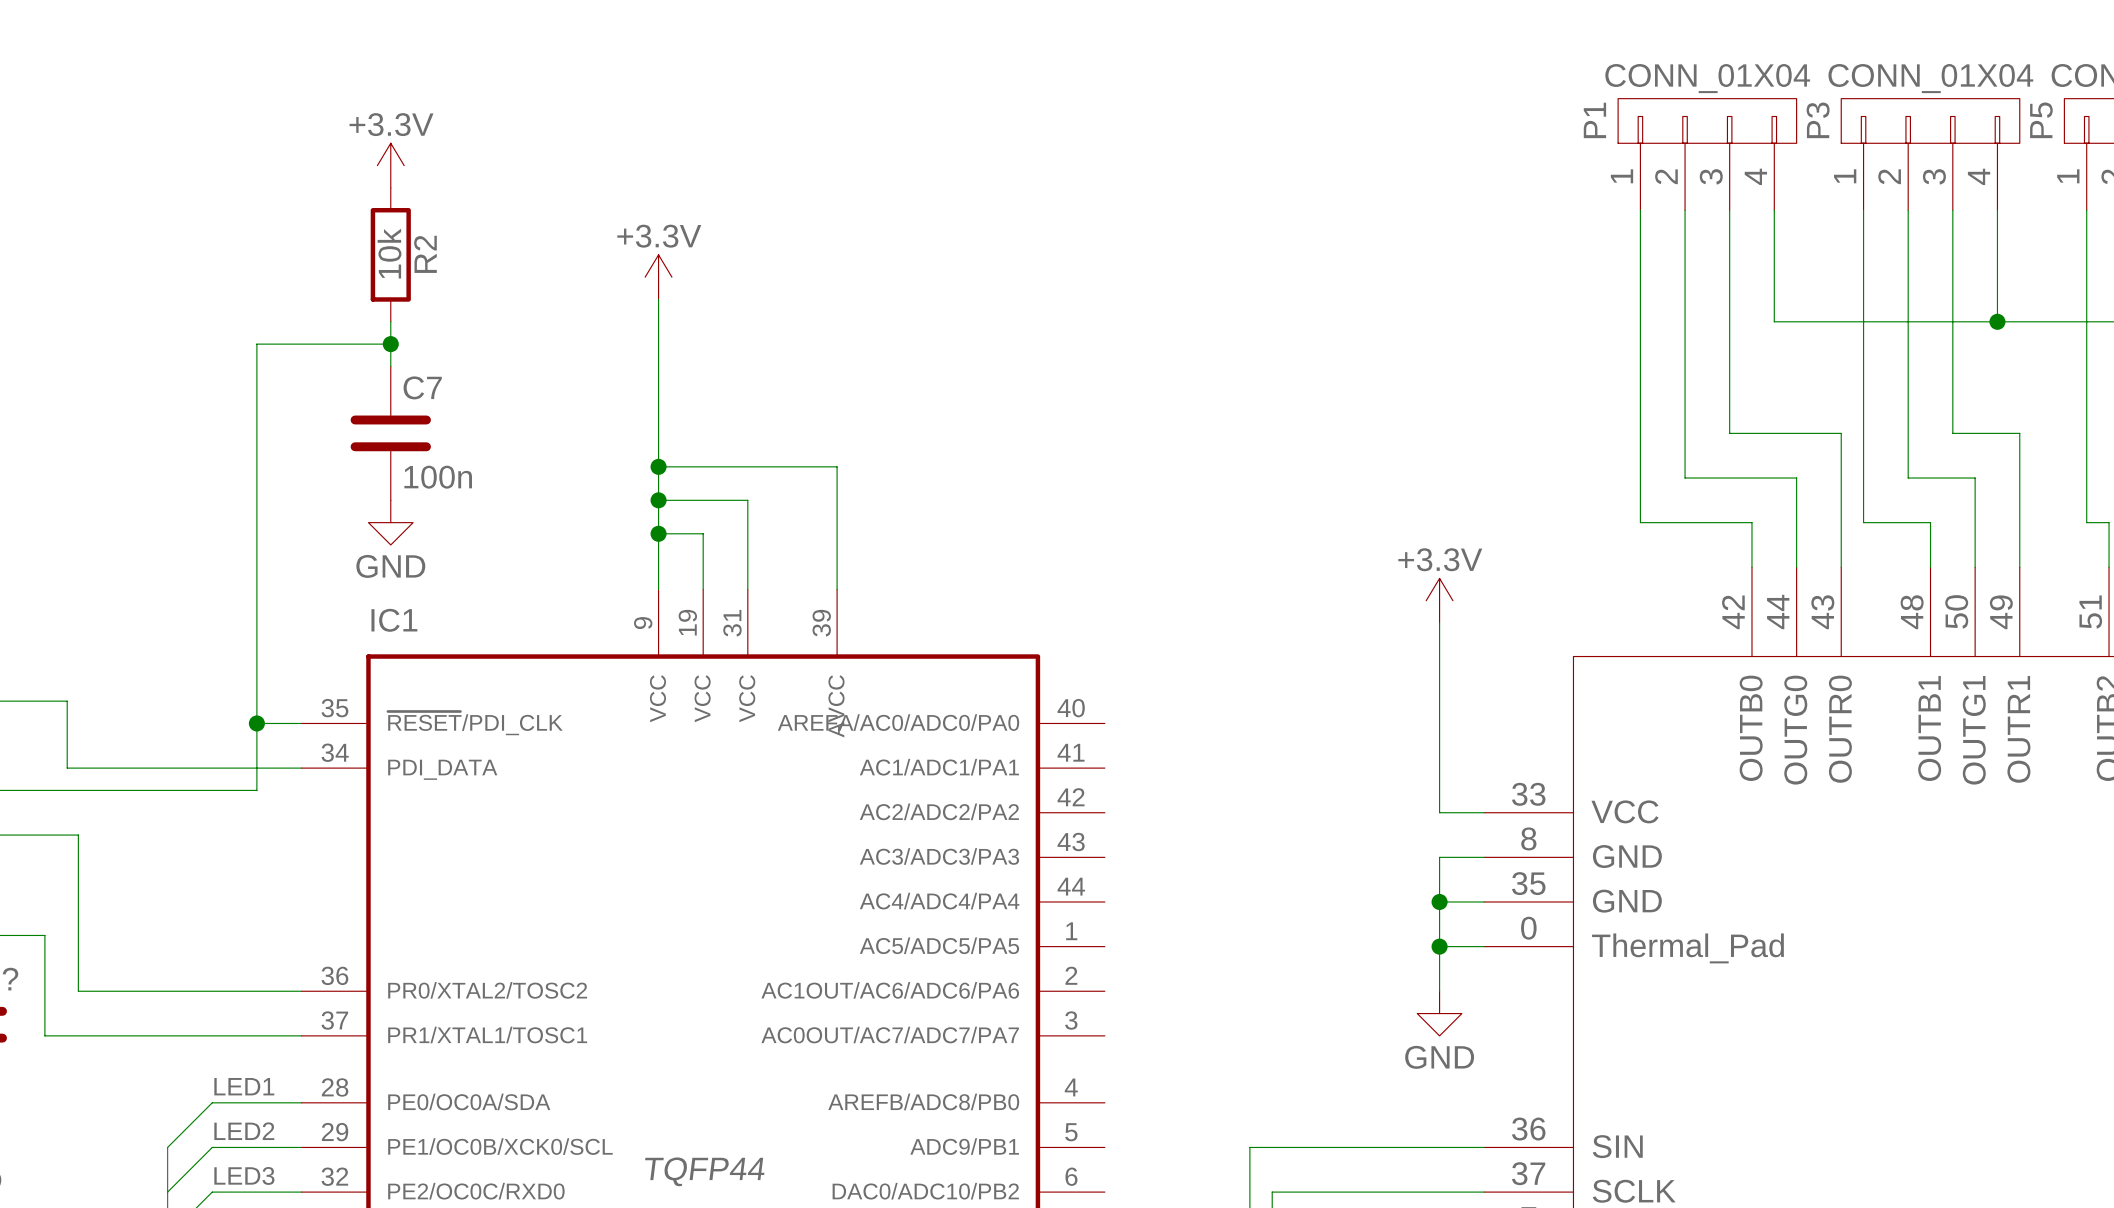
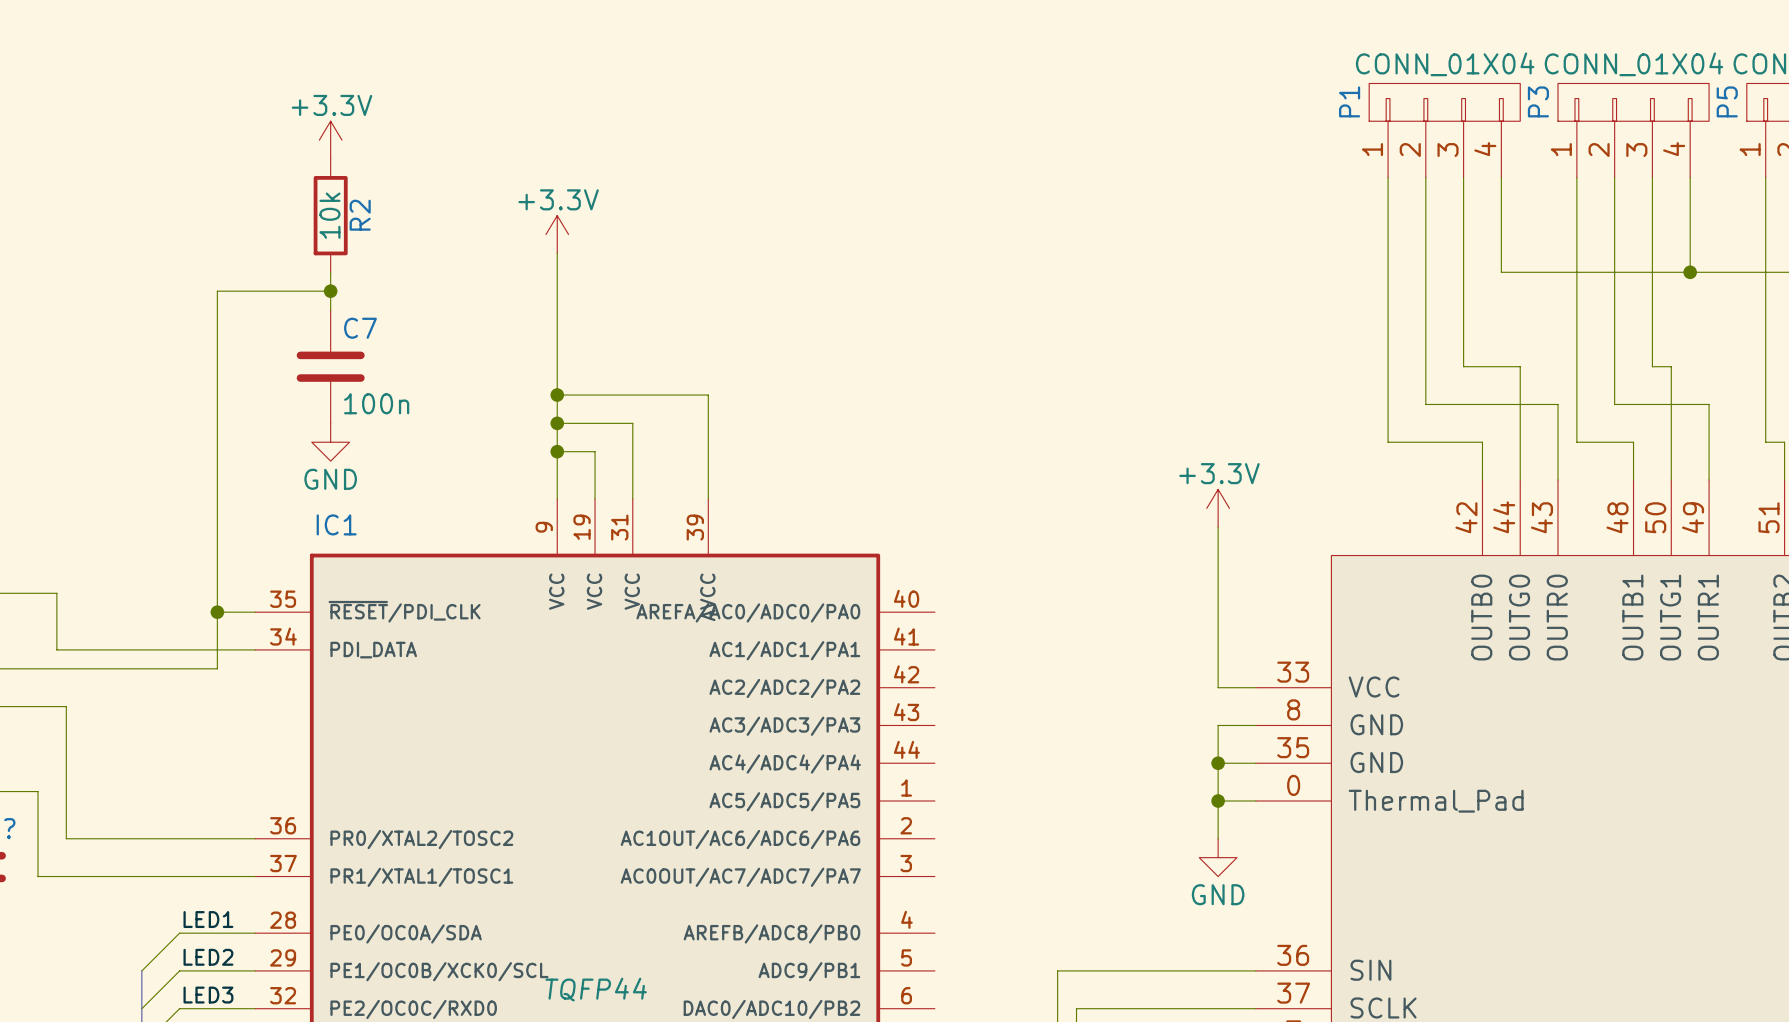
wire: (1796, 433) (1841, 433) (1841, 478) -> (1520, 366) (1520, 404) (1558, 404)
wire: (1975, 433) (2019, 433) (2019, 478) -> (1671, 366) (1671, 404) (1709, 404)

